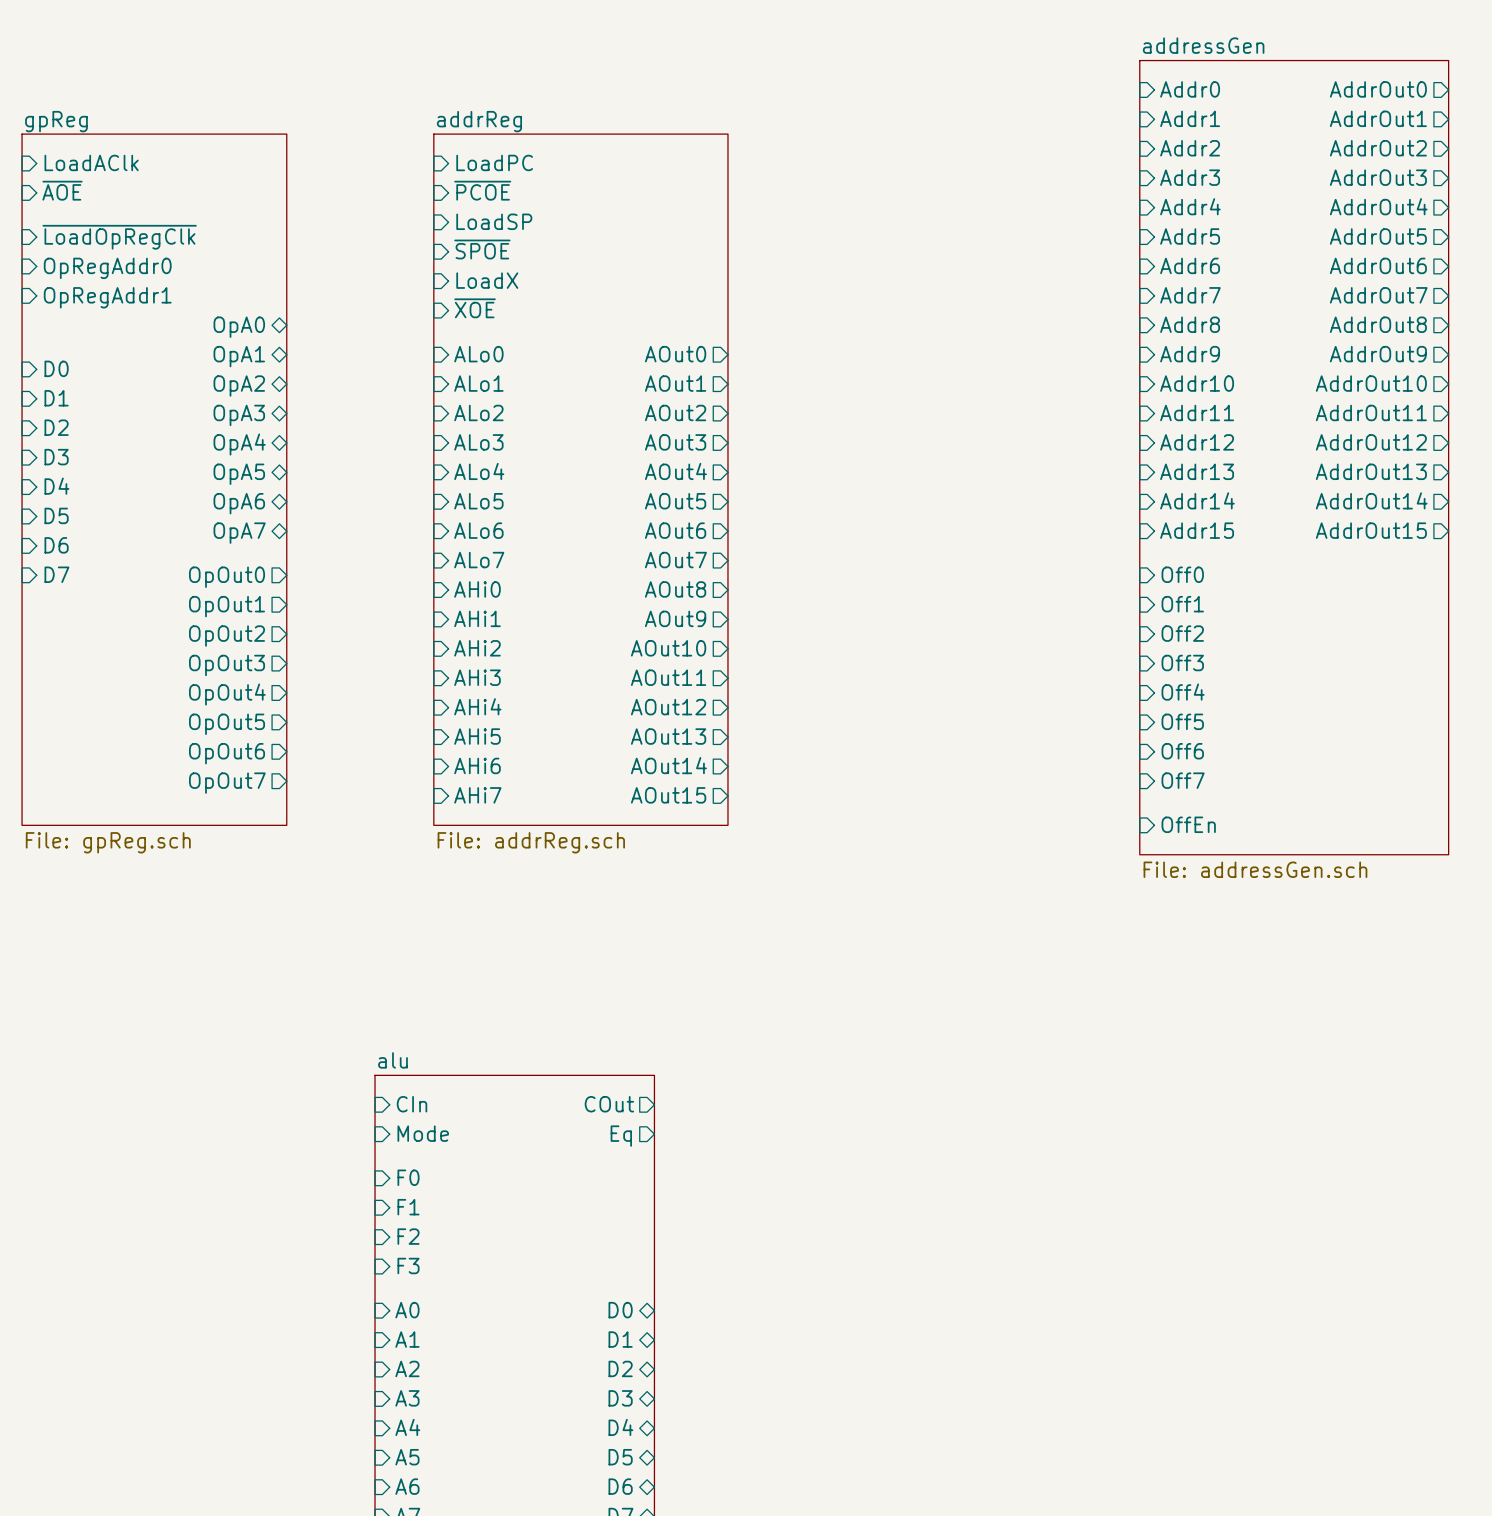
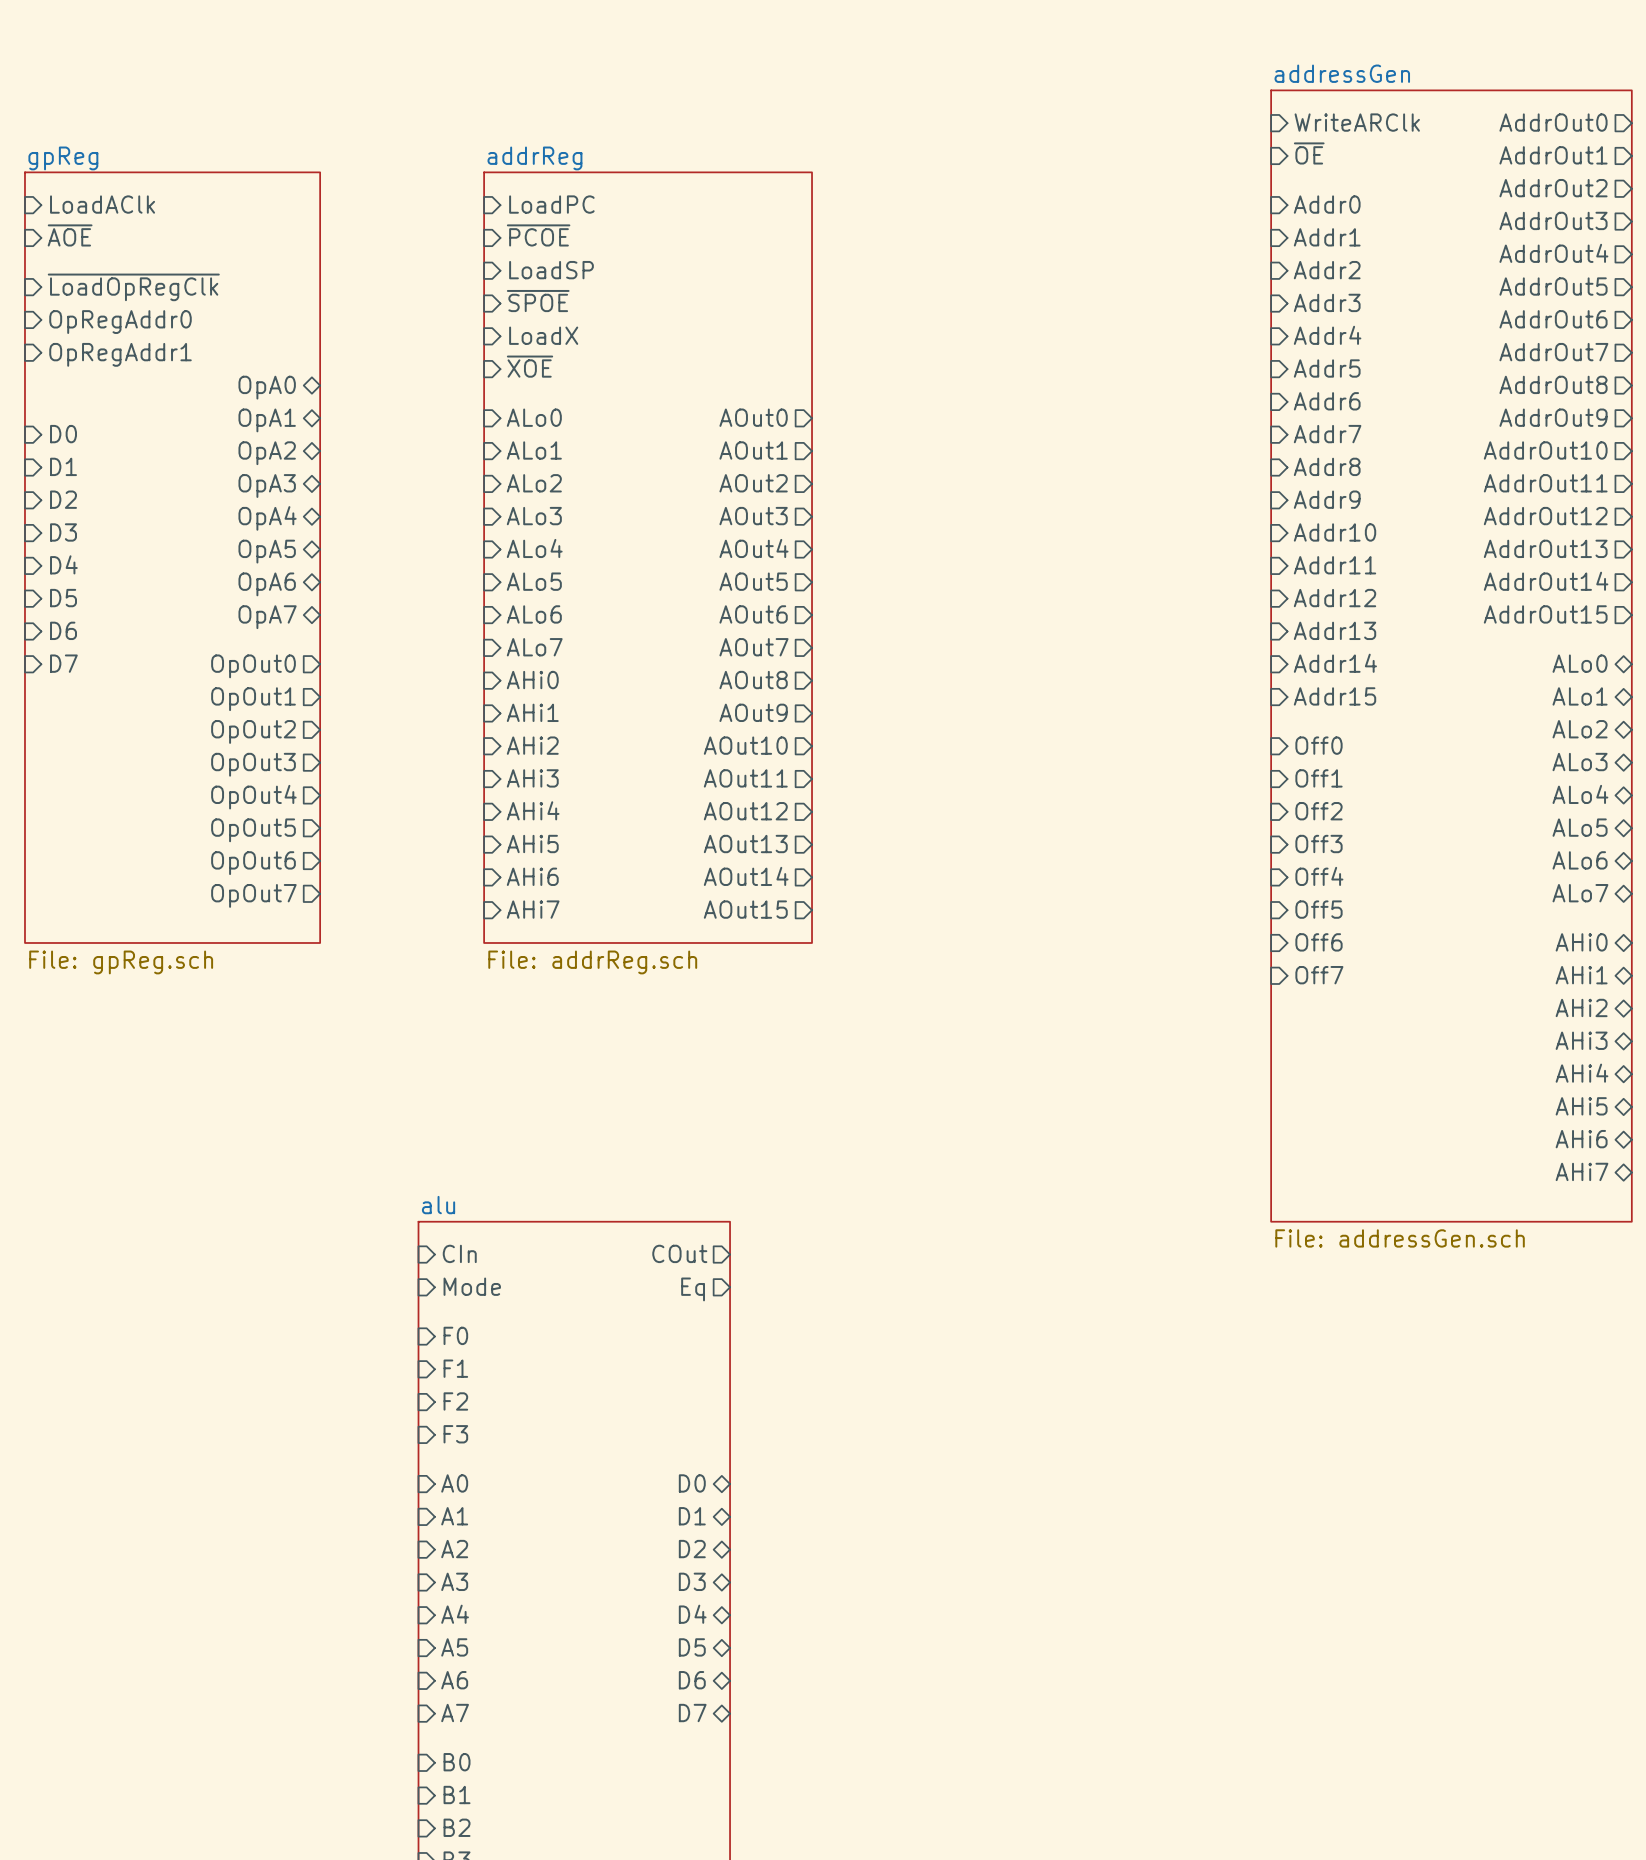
sheet pin: Addr0 (1190, 89) -> WriteARClk (1357, 122)
sheet pin position: AddrOut0 (1378, 89) -> AddrOut0 (1553, 122)
sheet pin: Addr1 (1190, 118) -> ~{OE} (1309, 153)
sheet pin position: AddrOut1 (1378, 118) -> AddrOut1 (1553, 155)
sheet pin position: Addr2 (1190, 148) -> Addr2 (1327, 270)
sheet pin position: AddrOut2 (1378, 148) -> AddrOut2 (1553, 188)
sheet pin: none -> Addr0 (1327, 204)
sheet pin position: Addr3 (1190, 177) -> Addr3 (1327, 302)
sheet pin position: AddrOut3 (1378, 177) -> AddrOut3 (1553, 220)
sheet pin: none -> Addr1 (1327, 237)
sheet pin position: Addr4 (1190, 206) -> Addr4 (1327, 335)
sheet pin position: AddrOut4 (1378, 206) -> AddrOut4 (1553, 253)
sheet pin position: Addr5 (1190, 236) -> Addr5 (1327, 368)
sheet pin position: AddrOut5 (1378, 236) -> AddrOut5 (1553, 286)
sheet pin position: Addr6 (1190, 265) -> Addr6 (1327, 401)
sheet pin position: AddrOut6 (1378, 265) -> AddrOut6 (1553, 319)
sheet pin position: Addr7 (1190, 295) -> Addr7 (1327, 434)
sheet pin position: AddrOut7 (1378, 295) -> AddrOut7 (1553, 352)
sheet pin position: Addr8 (1190, 324) -> Addr8 (1327, 466)
sheet pin position: AddrOut8 (1378, 324) -> AddrOut8 (1553, 384)
sheet pin position: Addr9 (1190, 354) -> Addr9 (1327, 499)
sheet pin position: AddrOut9 (1378, 354) -> AddrOut9 (1553, 417)
sheet pin position: Addr10 (1197, 383) -> Addr10 (1335, 532)
sheet pin position: AddrOut10 (1371, 383) -> AddrOut10 (1545, 450)
sheet pin position: Addr11 (1197, 412) -> Addr11 (1335, 565)
sheet pin position: AddrOut11 (1371, 412) -> AddrOut11 (1545, 483)
sheet pin position: Addr12 (1197, 442) -> Addr12 (1335, 598)
sheet pin position: AddrOut12 (1371, 442) -> AddrOut12 (1545, 516)
sheet addressGen: File: addressGen.sch (1294, 457) -> none
sheet pin position: Addr13 (1197, 471) -> Addr13 (1335, 630)
sheet pin position: AddrOut13 (1371, 471) -> AddrOut13 (1545, 548)
sheet pin: Addr14 (1197, 500) -> none
sheet pin position: AddrOut14 (1371, 500) -> AddrOut14 (1546, 581)
sheet pin: Addr15 (1197, 530) -> none
sheet pin position: AddrOut15 (1371, 530) -> AddrOut15 (1545, 614)
sheet addressGen: none -> File: addressGen.sch (1451, 656)
sheet pin: Off0 (1182, 574) -> Addr14 (1335, 663)
sheet pin: none -> ALo0 (1580, 663)
sheet pin: Off1 (1182, 604) -> Addr15 (1335, 696)
sheet pin: none -> ALo1 (1580, 696)
sheet pin position: Off2 (1182, 633) -> Off2 (1318, 811)
sheet pin: none -> ALo2 (1580, 729)
sheet pin: none -> Off0 (1318, 745)
sheet pin position: Off3 (1182, 663) -> Off3 (1318, 844)
sheet pin: none -> ALo3 (1580, 762)
sheet pin: none -> Off1 (1318, 778)
sheet pin position: Off4 (1183, 692) -> Off4 (1319, 876)
sheet pin: none -> ALo4 (1580, 794)
sheet pin position: Off5 (1182, 721) -> Off5 (1318, 909)
sheet pin: none -> ALo5 (1580, 827)
sheet pin: Off6 (1182, 751) -> none
sheet pin: none -> ALo6 (1580, 860)
sheet pin position: Off7 (1183, 780) -> Off7 (1319, 975)
sheet pin: none -> ALo7 (1580, 893)
sheet pin: OffEn (1188, 824) -> Off6 (1318, 942)
sheet pin: none -> AHi0 (1581, 942)
sheet pin: none -> AHi1 (1581, 975)
sheet pin: none -> AHi2 (1581, 1007)
sheet pin: none -> AHi3 (1581, 1040)
sheet pin: none -> AHi4 (1581, 1073)
sheet pin: none -> AHi5 (1581, 1106)
sheet pin: none -> AHi6 (1581, 1139)
sheet pin: none -> AHi7 (1581, 1171)

